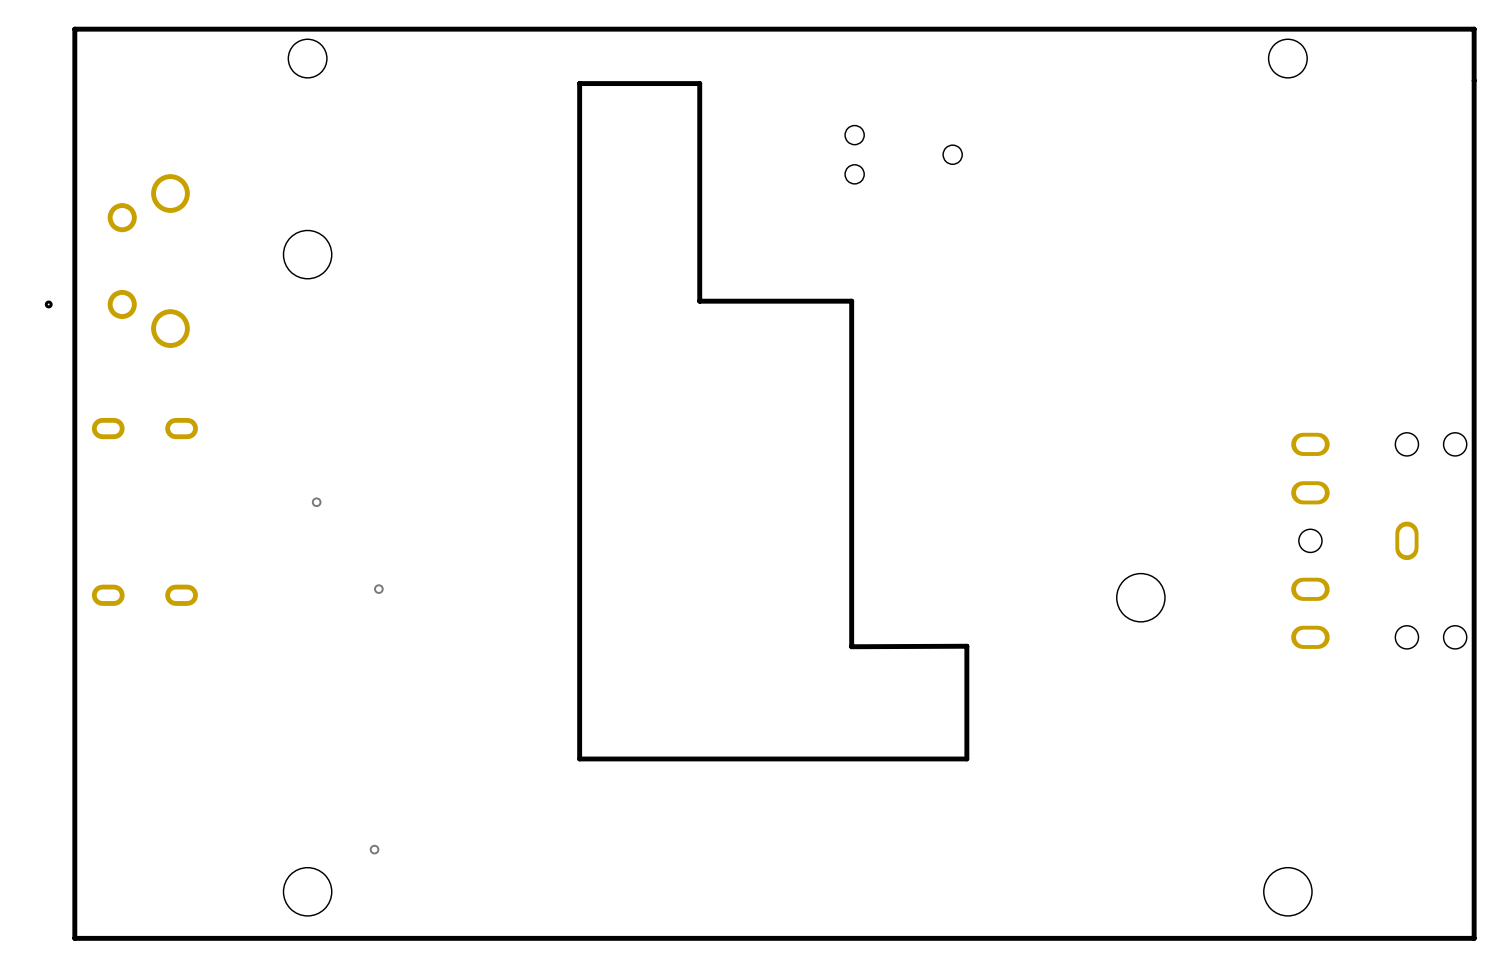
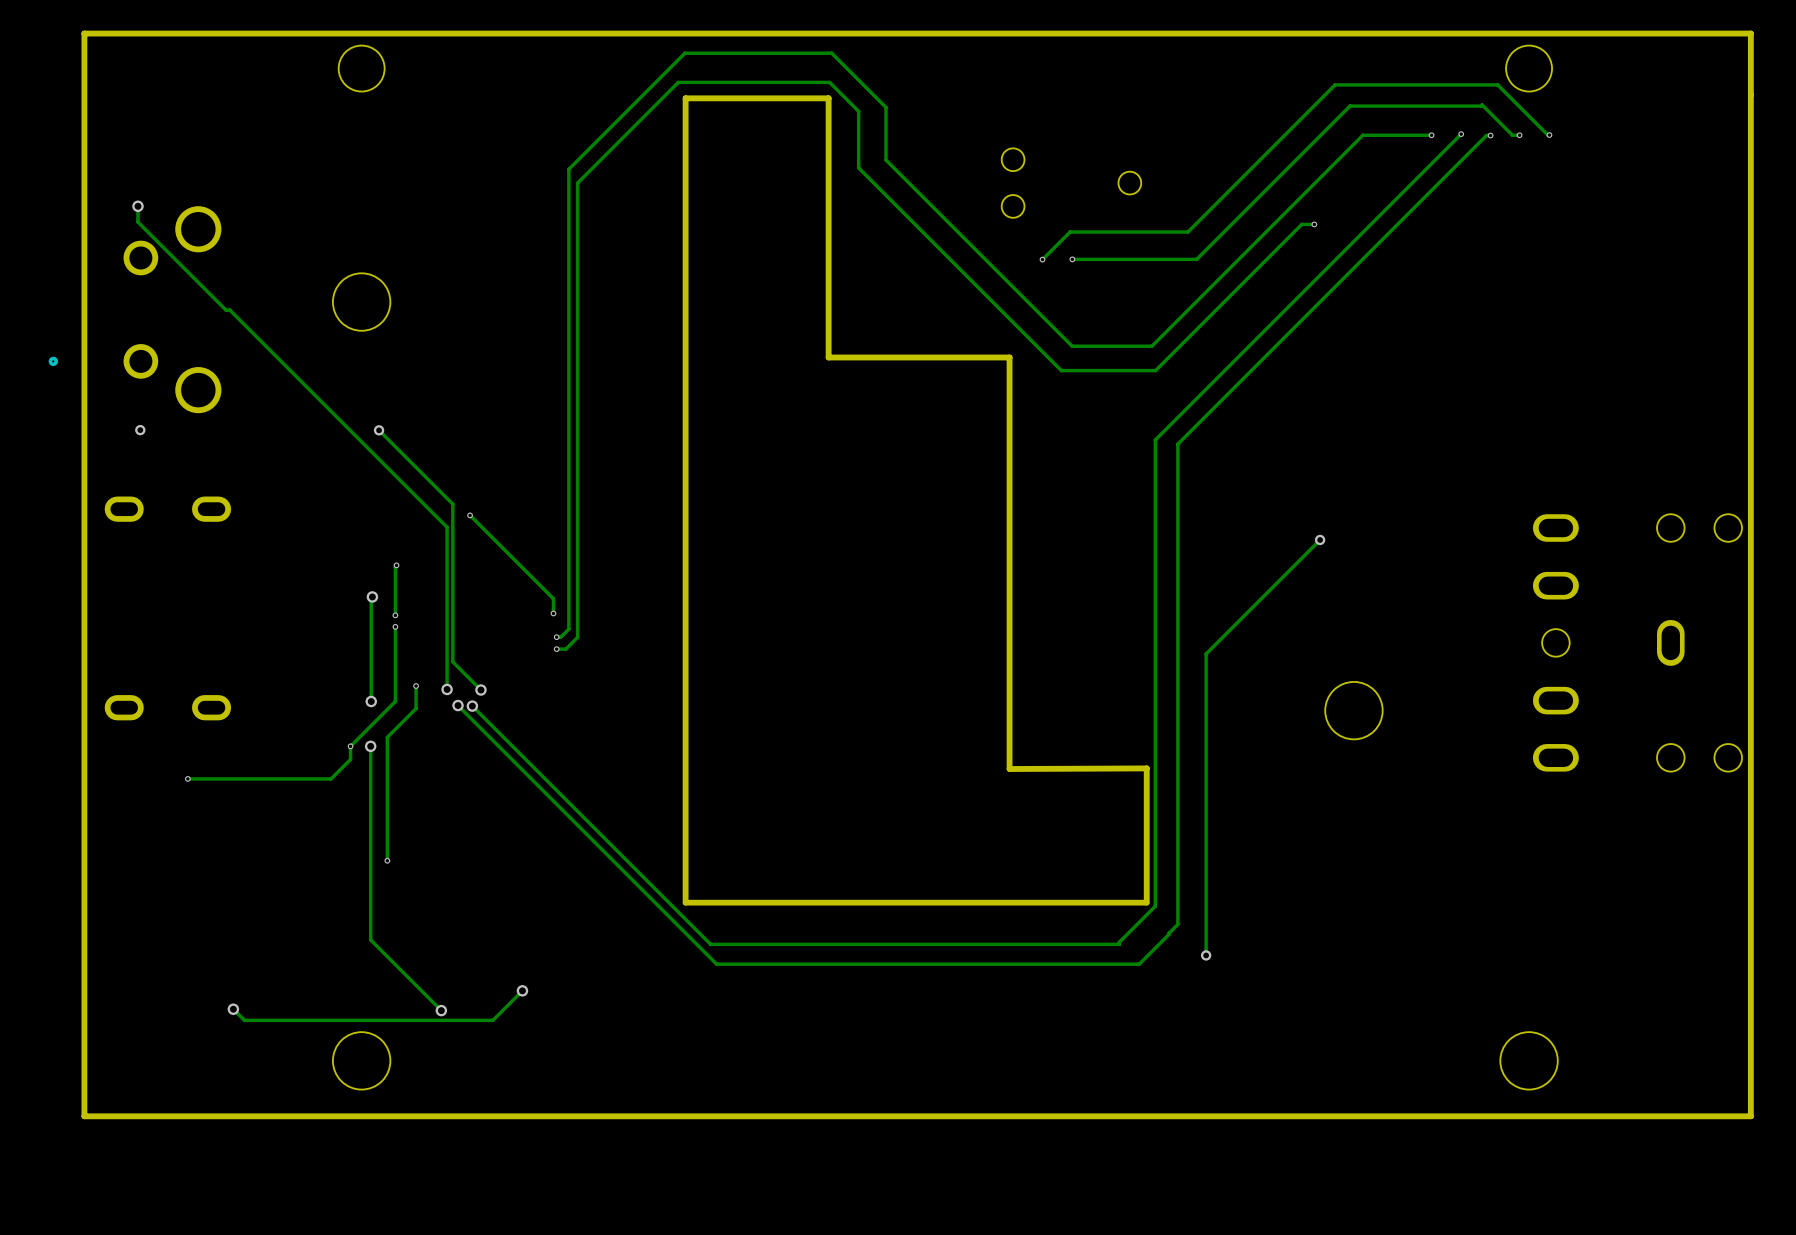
track: none -> (1461, 134) (1155, 439) (1155, 906) (1119, 944) (710, 944) (472, 706)
via: none -> (1461, 134)
track: none -> (1431, 135) (1362, 135) (1151, 346) (1072, 346) (886, 160) (886, 107) (831, 53) (684, 53) (568, 169) (568, 629) (560, 637) (556, 637)
via: none -> (1431, 135)
track: none -> (1490, 135) (1486, 135) (1177, 444) (1177, 924) (1139, 964) (716, 964) (458, 705)
via: none -> (1490, 135)
track: none -> (1519, 135) (1512, 135) (1482, 104) (1349, 106) (1196, 259) (1072, 259)
via: none -> (1519, 135)
track: none -> (1549, 135) (1497, 84) (1335, 84) (1187, 232) (1070, 232) (1042, 259)
via: none -> (1549, 135)
track: none -> (138, 206) (138, 222) (226, 310) (229, 310) (447, 527) (447, 689)
via: none -> (138, 206)
track: none -> (1314, 224) (1301, 224) (1155, 370) (1061, 370) (858, 167) (858, 111) (829, 82) (678, 82) (577, 183) (577, 637) (565, 649) (556, 649)
via: none -> (1314, 224)
via: none -> (1042, 259)
via: none -> (1072, 259)
via: none -> (140, 430)
track: none -> (379, 430) (452, 504) (452, 661) (480, 690)
via: none -> (379, 430)
track: none -> (470, 515) (553, 598) (553, 613)
via: none -> (470, 515)
track: none -> (1320, 539) (1206, 653) (1206, 955)
via: none -> (1320, 539)
track: none -> (396, 565) (395, 615)
via: none -> (396, 565)
track: none -> (372, 596) (371, 701)
via: none -> (553, 613)
via: none -> (395, 615)
track: none -> (395, 626) (395, 701) (350, 746) (350, 759) (331, 778) (187, 778)
via: none -> (395, 626)
via: none -> (556, 637)
via: none -> (556, 649)
track: none -> (416, 686) (416, 708) (387, 737) (387, 860)
via: none -> (416, 686)
via: none -> (447, 689)
via: none -> (480, 690)
via: (378, 589) -> none
via: none -> (371, 701)
via: none -> (458, 705)
via: none -> (472, 706)
via: none -> (350, 746)
track: none -> (370, 746) (370, 939) (441, 1010)
via: none -> (370, 746)
via: none -> (187, 778)
via: none -> (387, 860)
via: none -> (1206, 955)
track: none -> (522, 990) (492, 1020) (244, 1020) (233, 1009)
via: none -> (522, 990)
via: none -> (233, 1009)

